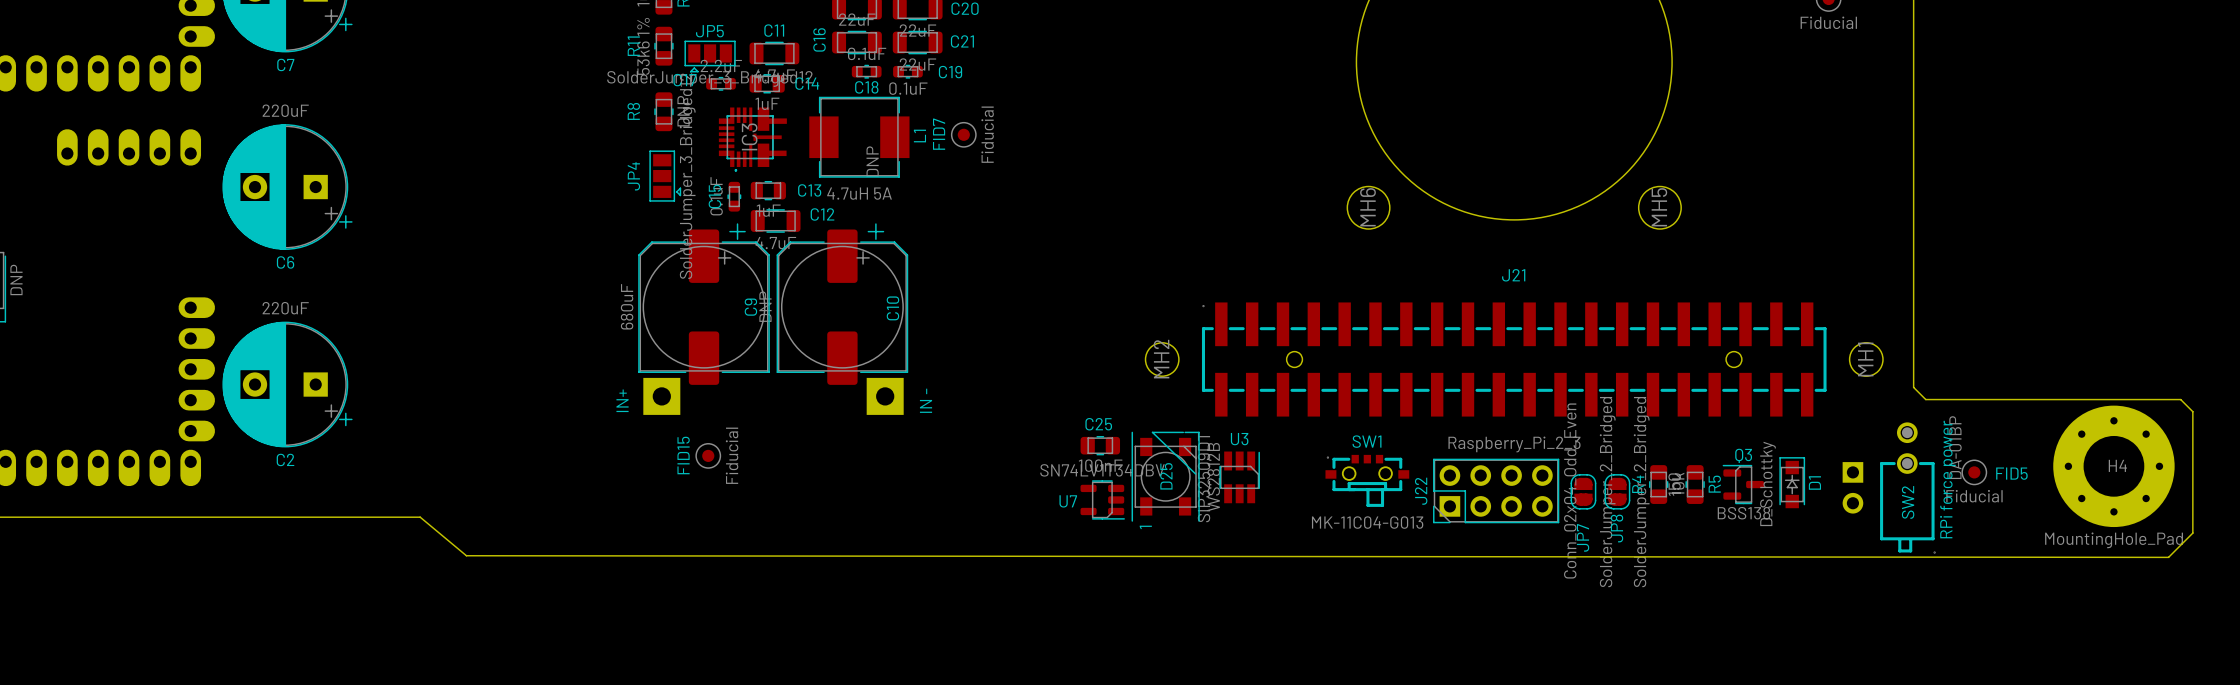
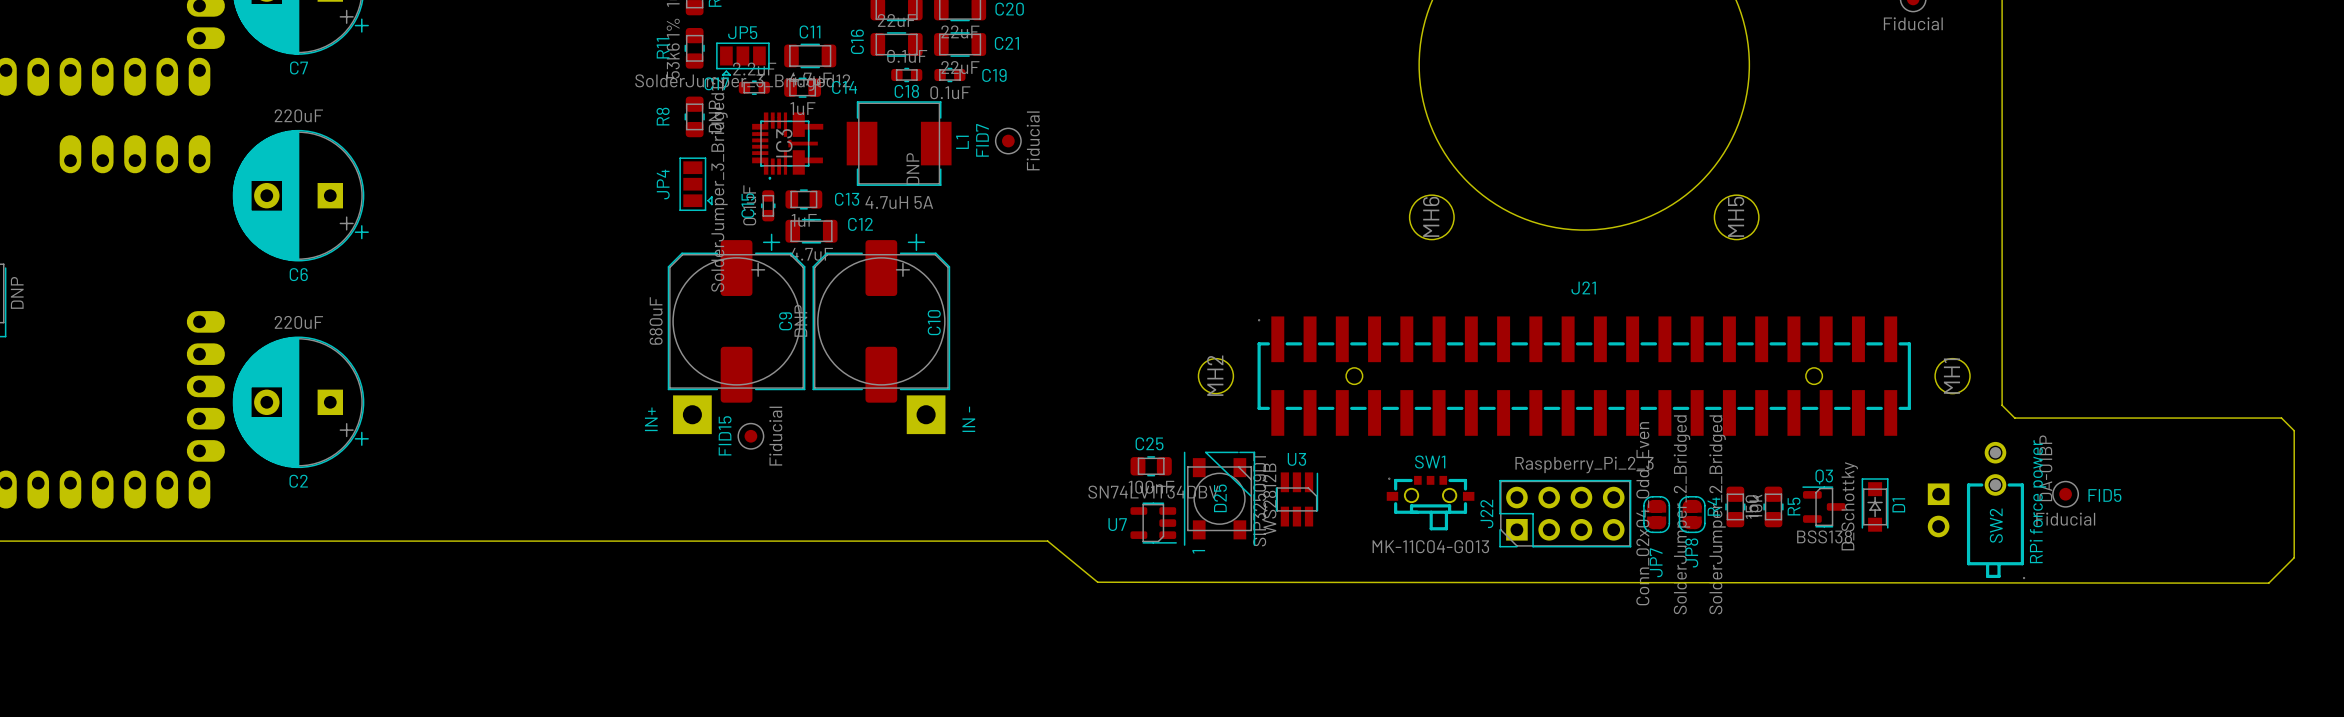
FID15 position: (708, 455) -> (750, 436)
H4: MountingHole_Pad (2113, 466) -> none
board edge: (420, 517) (466, 555) (2168, 557) -> (439, 541) (1047, 541) (1097, 582) (2268, 583)

